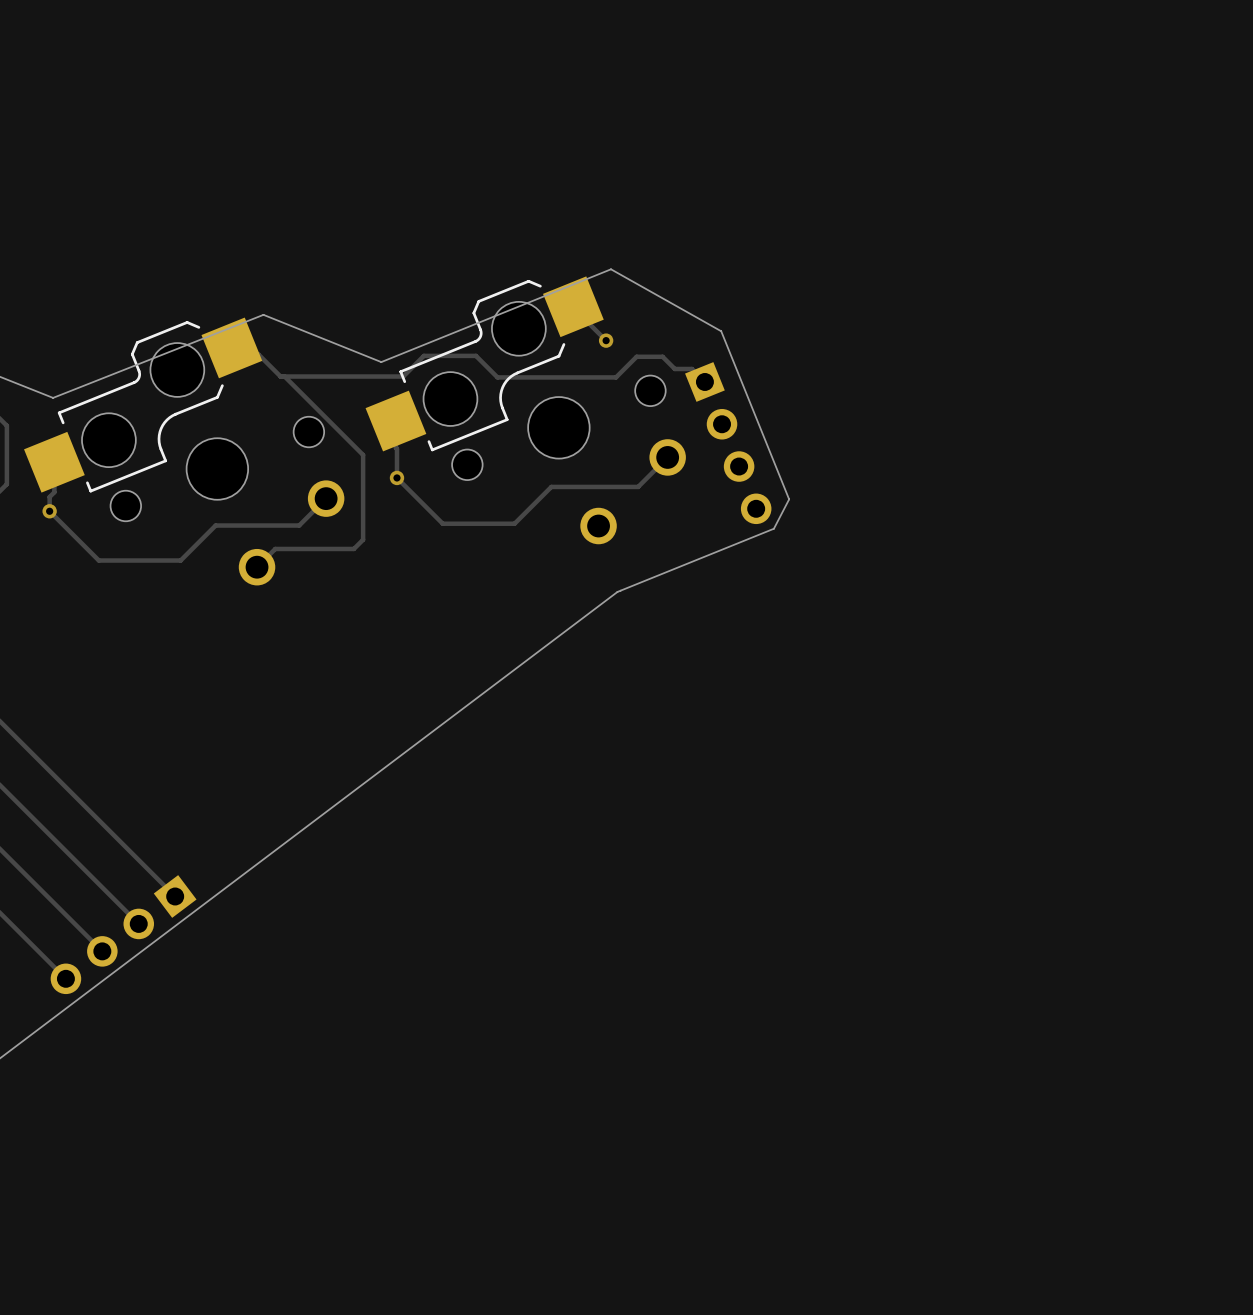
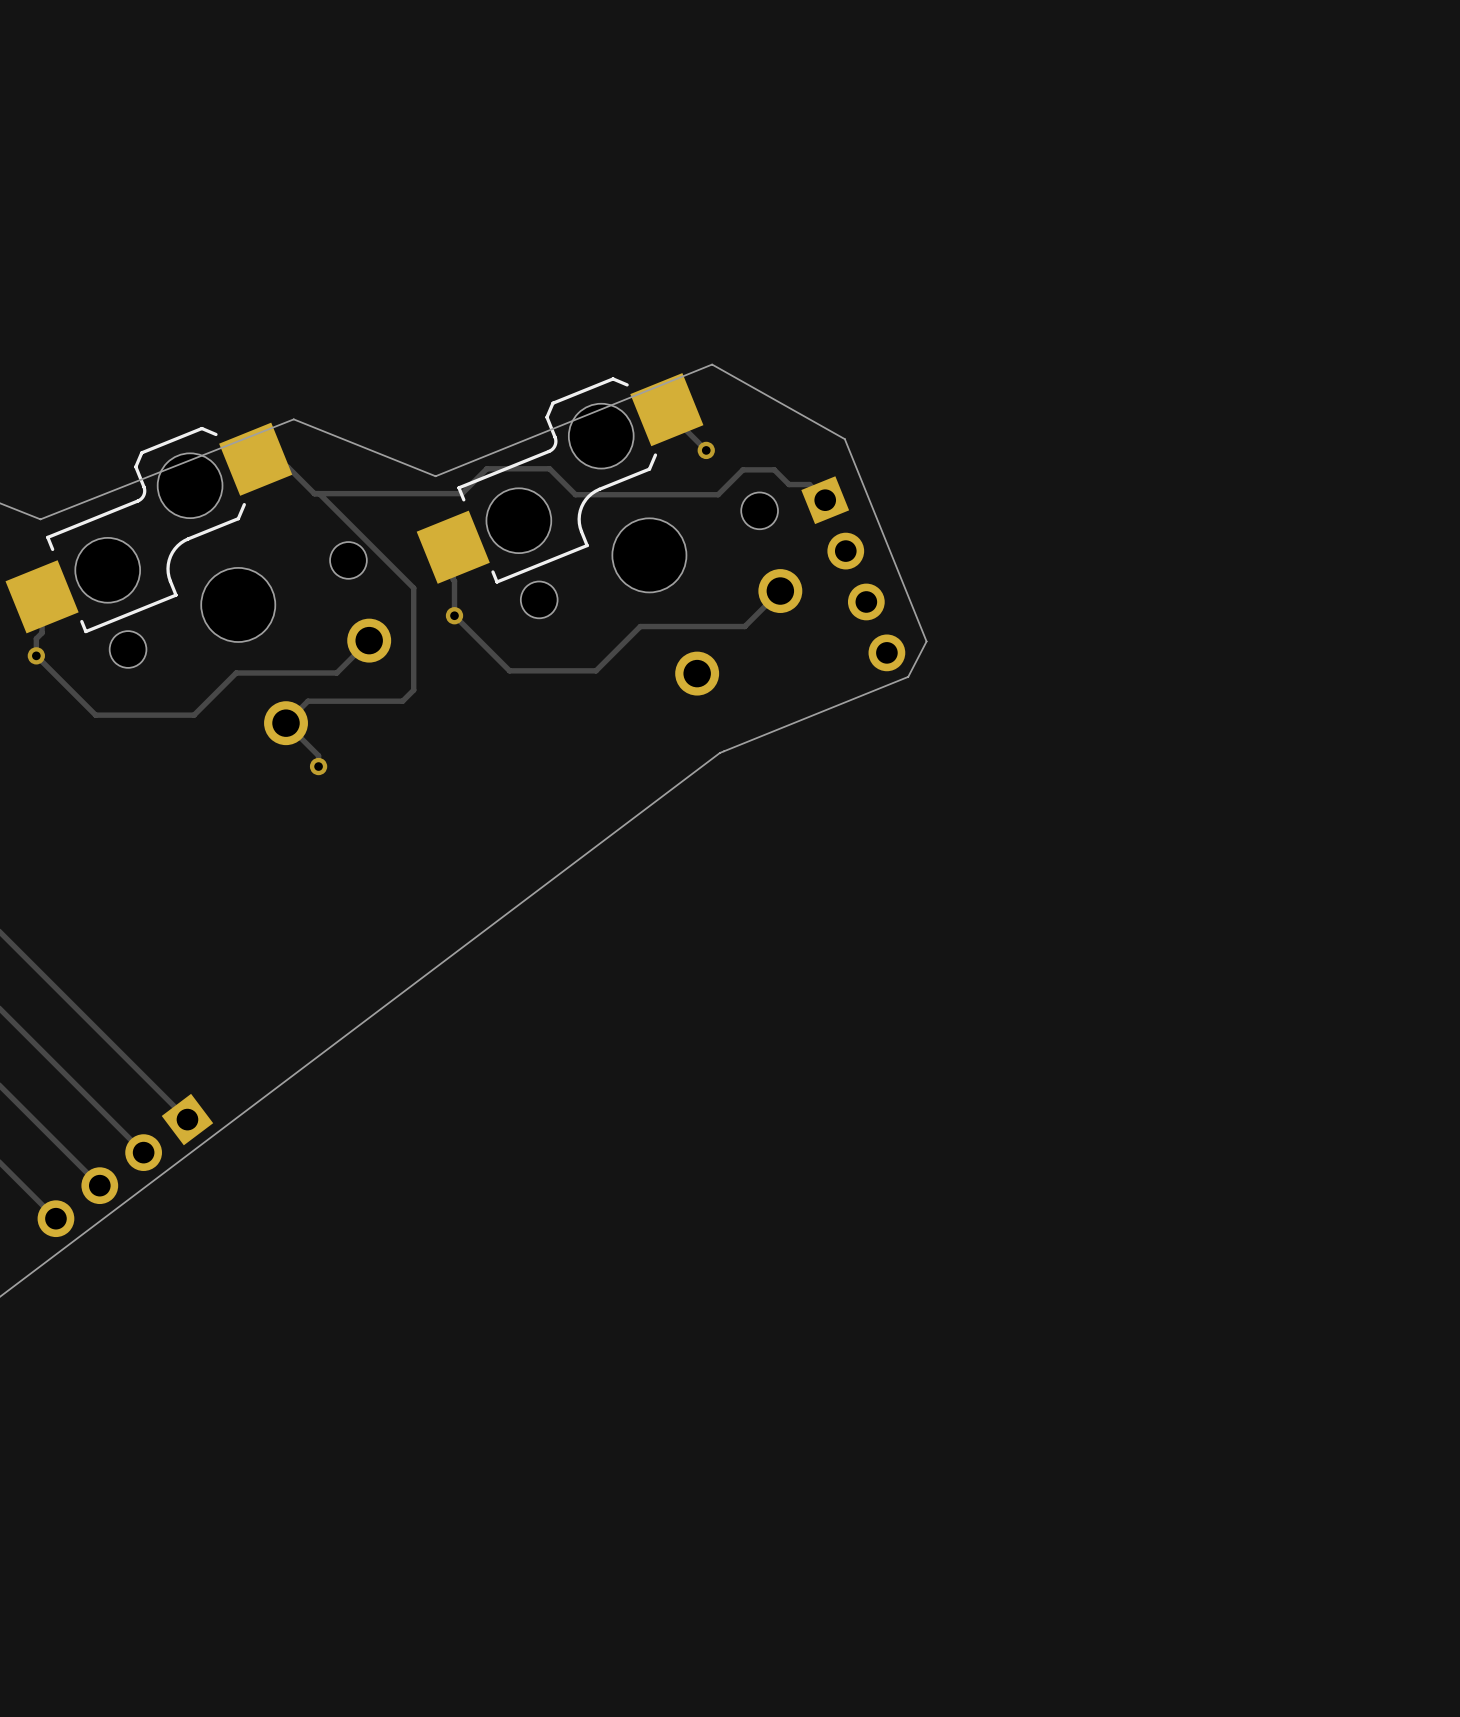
track: none -> (286, 723) (318, 755) (318, 766)
via: none -> (318, 766)

